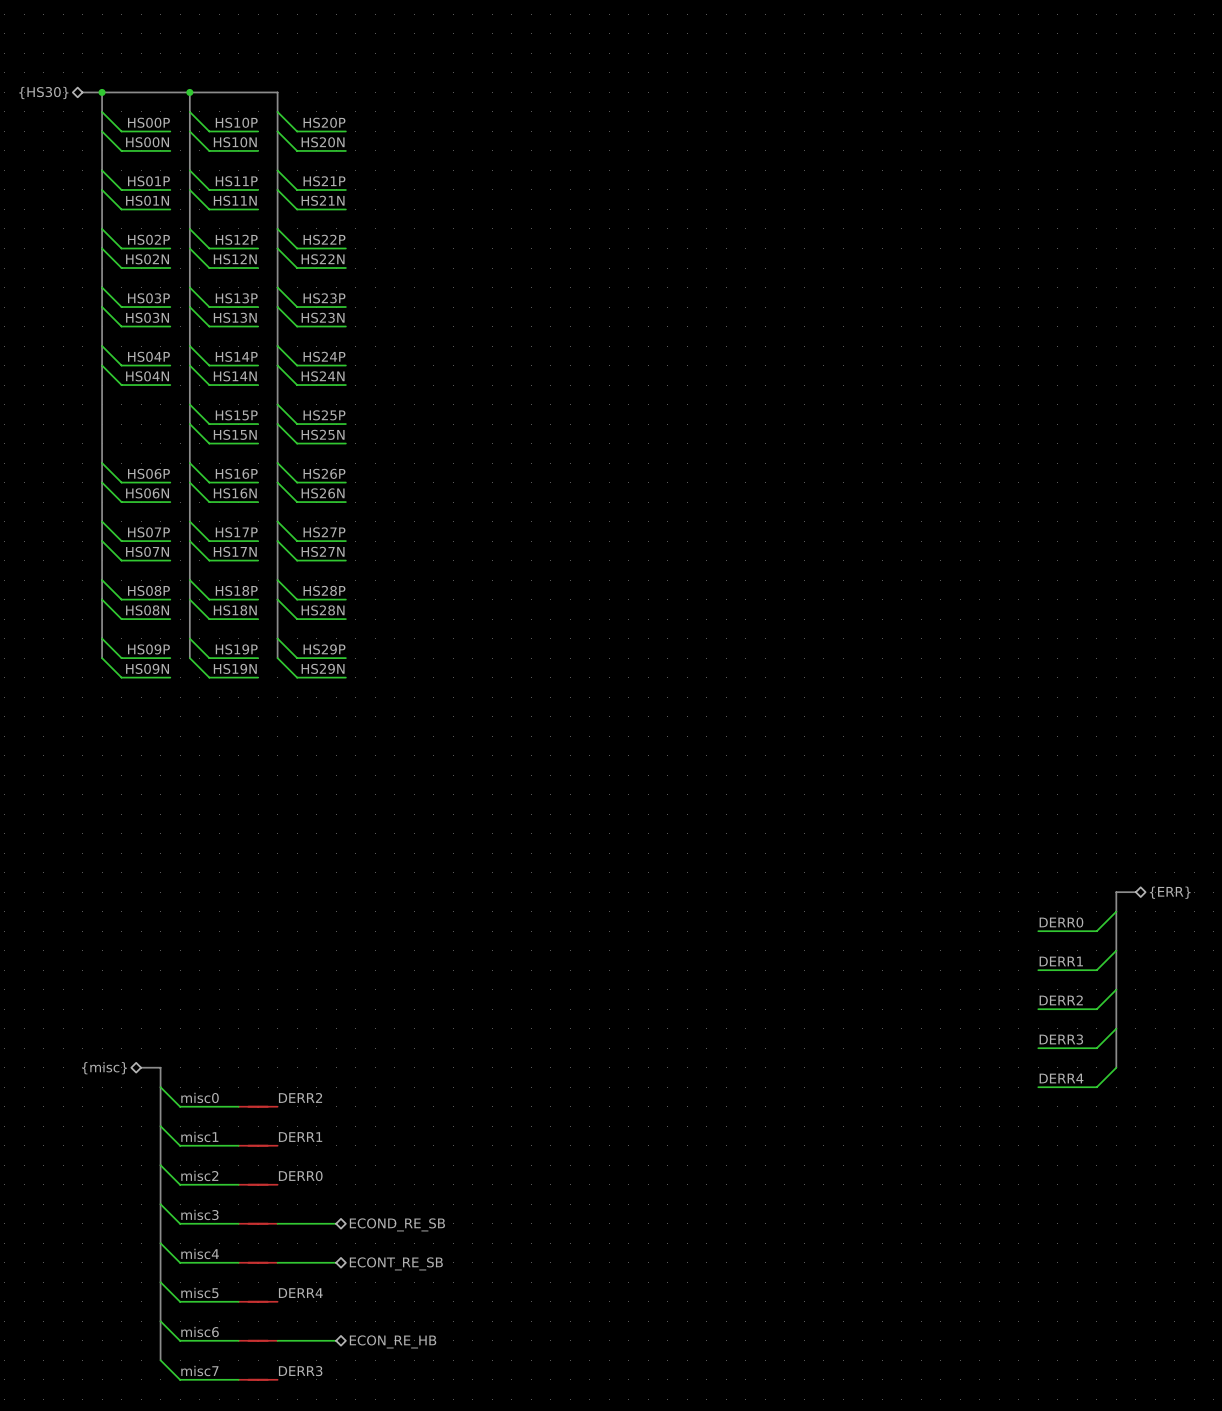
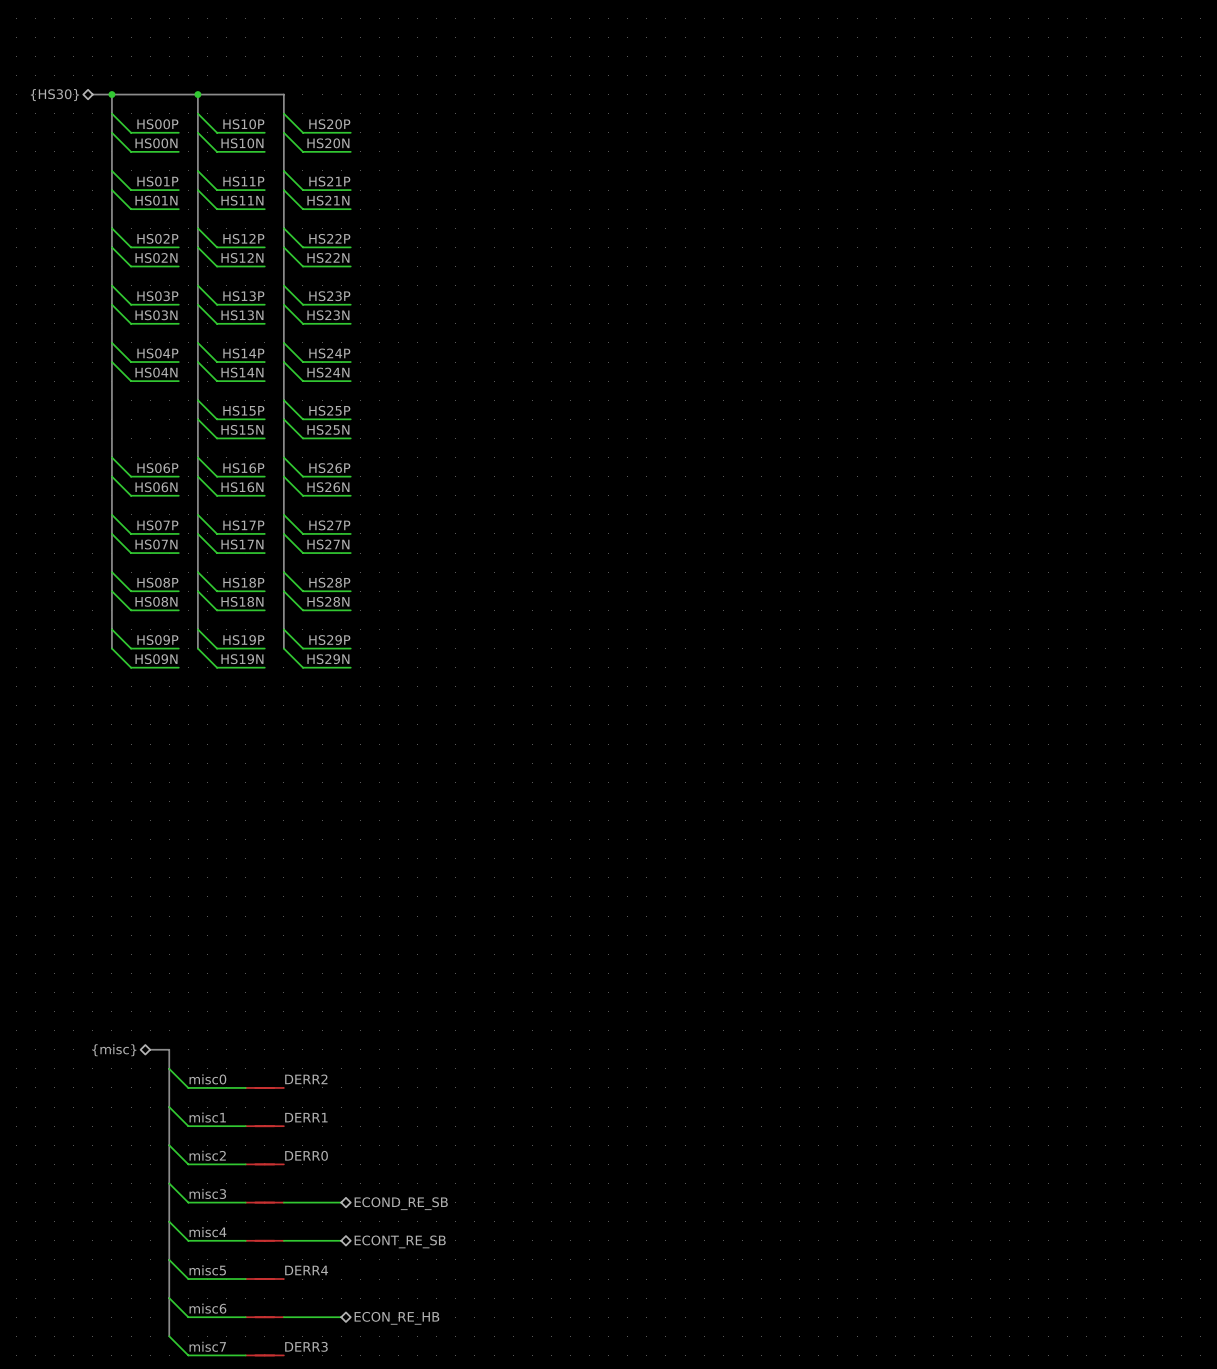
bus: (1135, 892) (1116, 892) (1116, 1067) -> none
hierarchical label: {ERR} (1170, 892) -> none
wire: (1116, 911) (1096, 931) (1038, 931) -> none
label: DERR0 (1061, 922) -> none
wire: (1116, 950) (1096, 970) (1038, 970) -> none
label: DERR1 (1061, 961) -> none
wire: (1116, 989) (1096, 1009) (1038, 1009) -> none
label: DERR2 (1061, 1000) -> none
wire: (1116, 1028) (1096, 1048) (1038, 1048) -> none
label: DERR3 (1061, 1039) -> none
wire: (1116, 1067) (1096, 1087) (1038, 1087) -> none
label: DERR4 (1061, 1078) -> none

